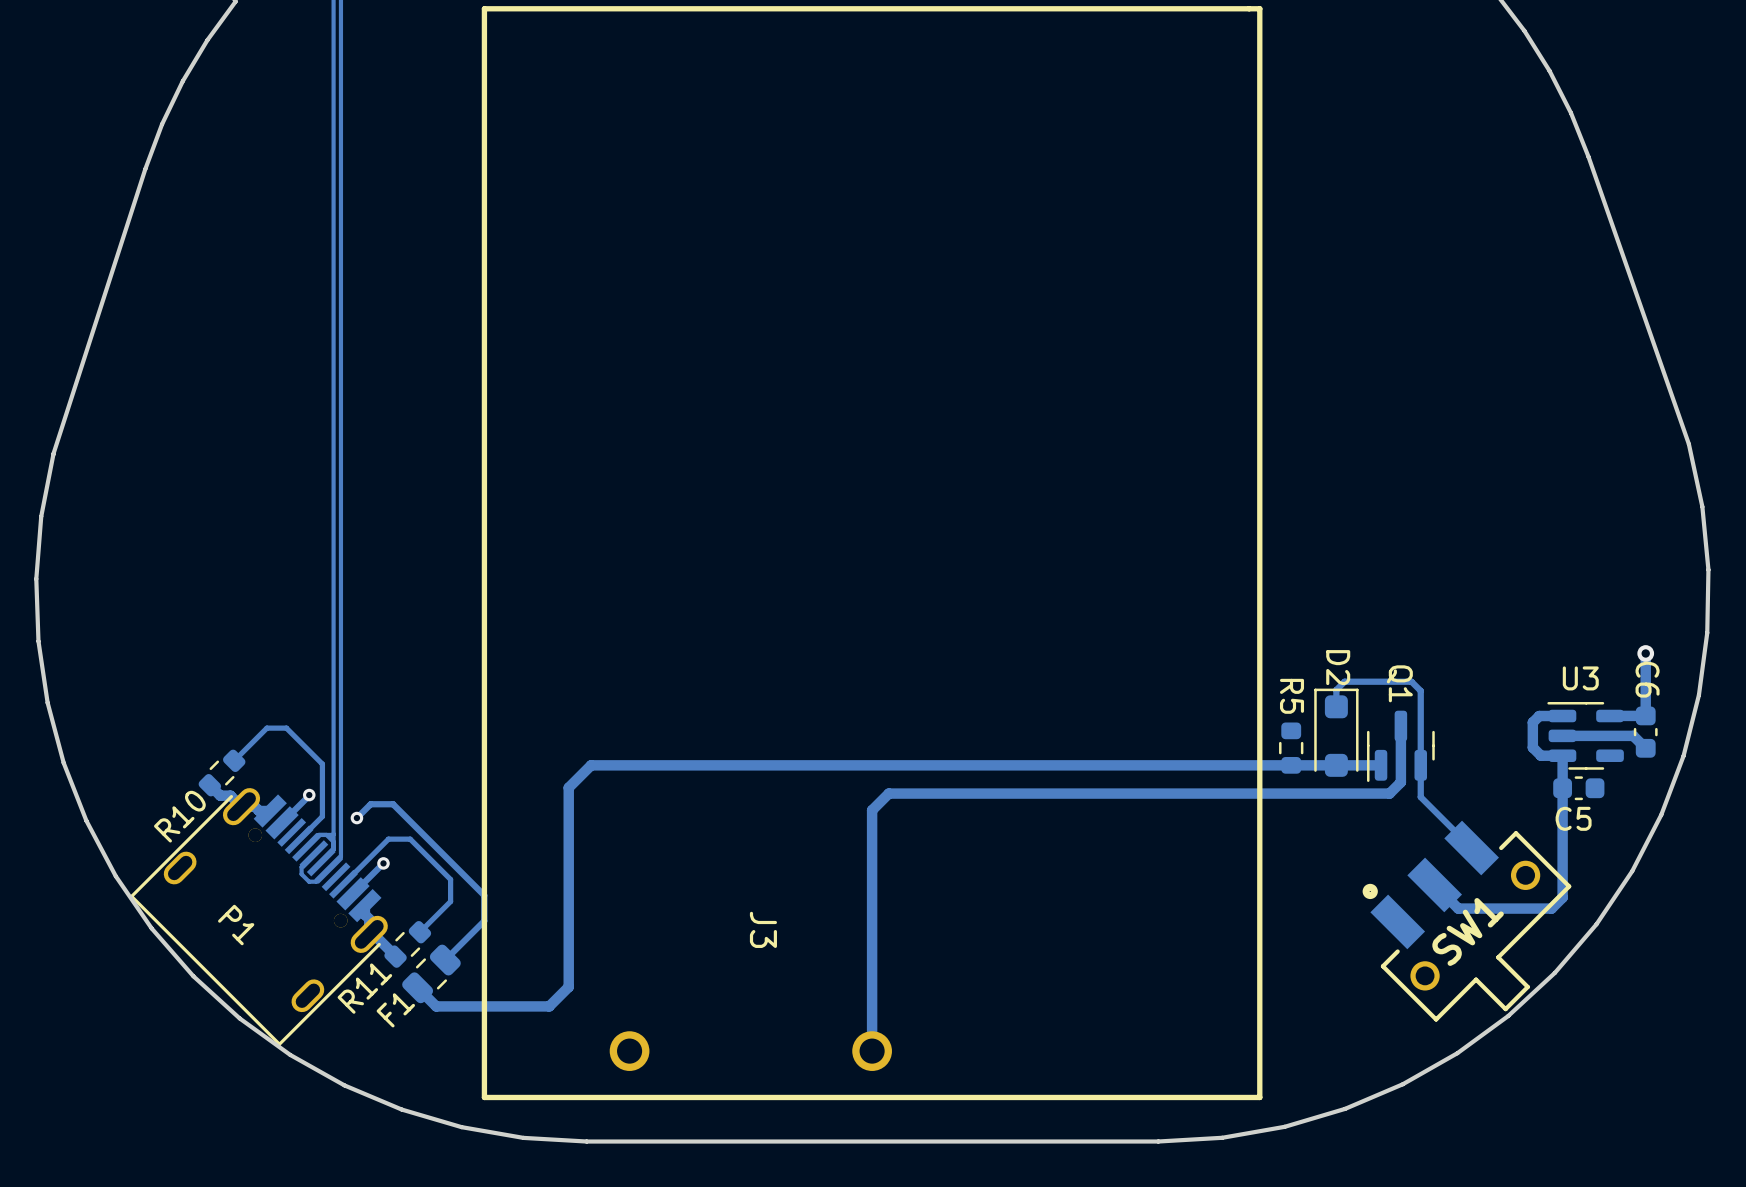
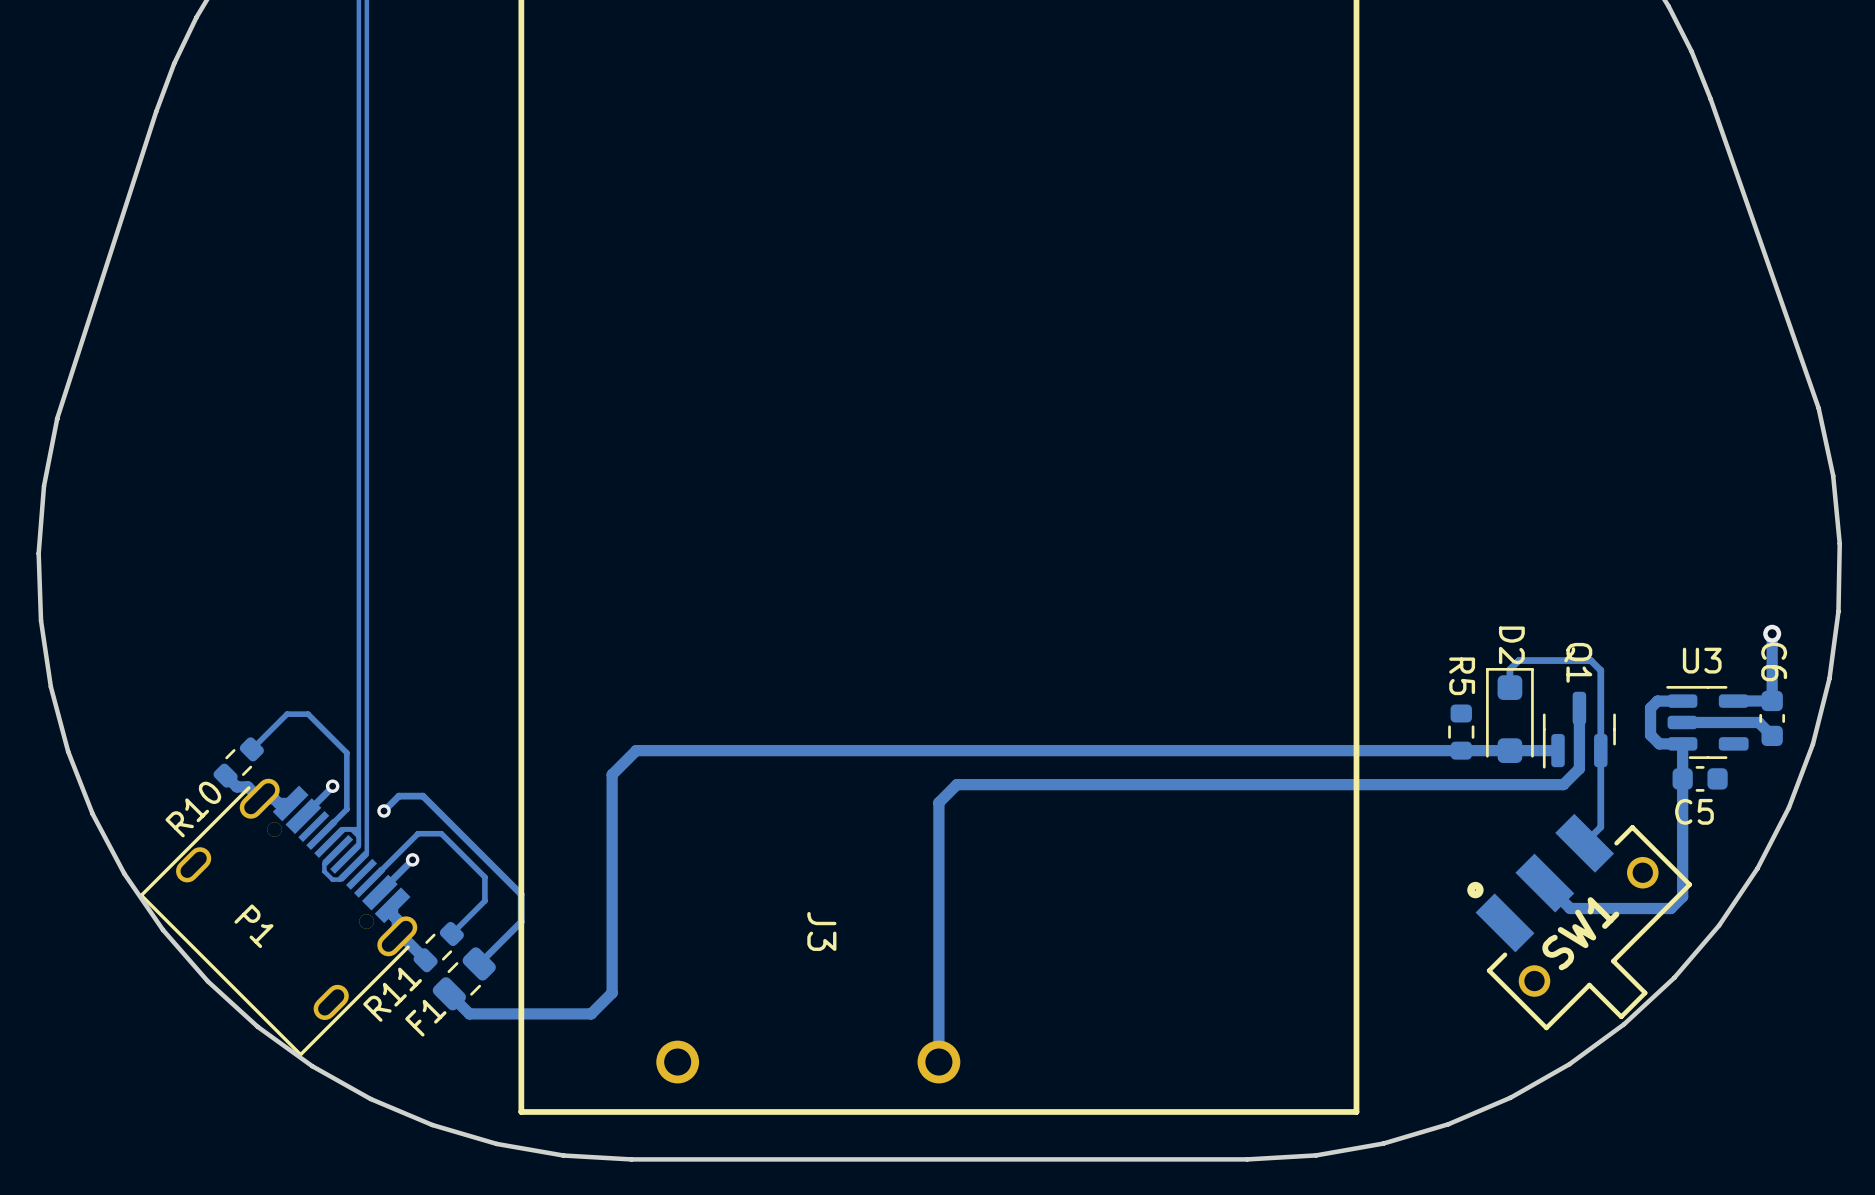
track: (1336, 706) (1336, 689) (1344, 681) (1411, 681) (1420, 690) (1420, 797) (1471, 848) -> (1509, 687) (1509, 669) (1518, 660) (1590, 660) (1600, 670) (1600, 827) (1584, 843)
track: (1400, 726) (1400, 782) (1389, 793) -> (1579, 708) (1579, 768) (1563, 784) (1496, 784)
D2 position: (1336, 732) -> (1509, 715)
Q1 position: (1400, 746) -> (1579, 730)
R5 position: (1291, 748) -> (1461, 732)
track: (1380, 765) (591, 765) (568, 787) -> (1557, 750) (636, 750) (612, 774) (612, 778)

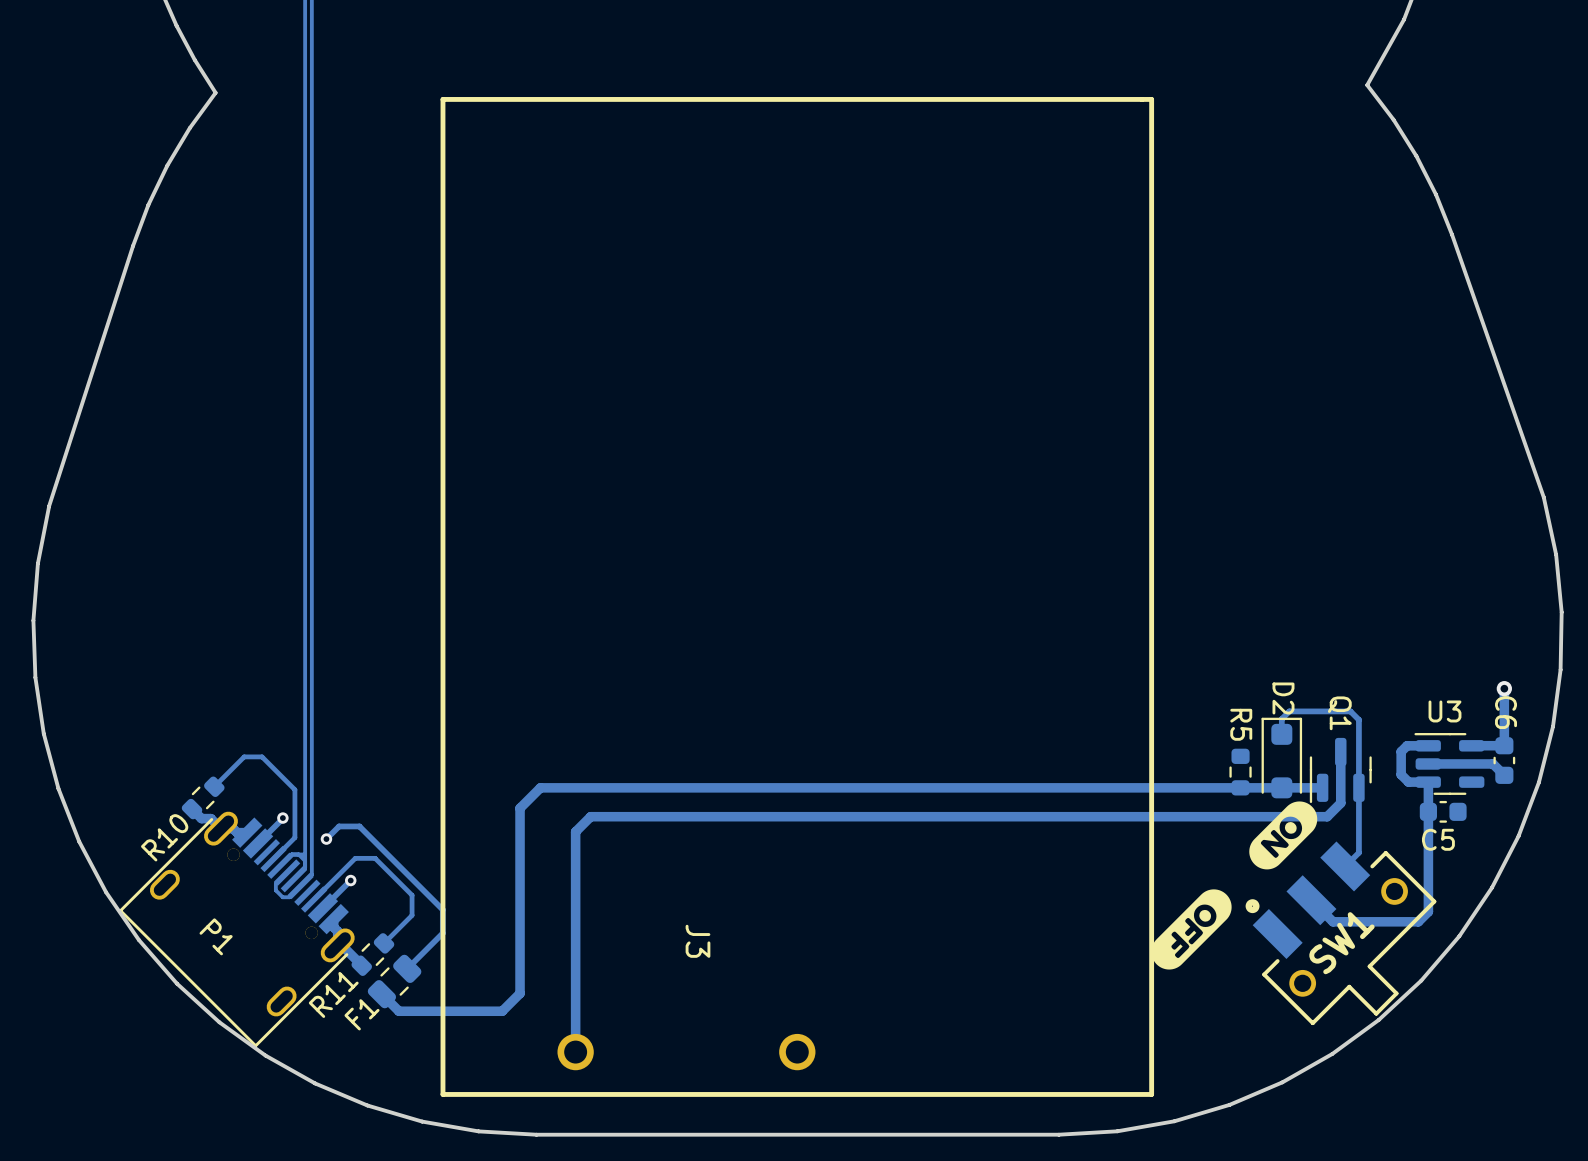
drawing: none -> [1249, 801, 1318, 870]
track: (956, 784) (938, 802) (938, 1062) -> (812, 816) (590, 816) (575, 831) (575, 1052)
drawing: none -> [1151, 889, 1232, 970]

